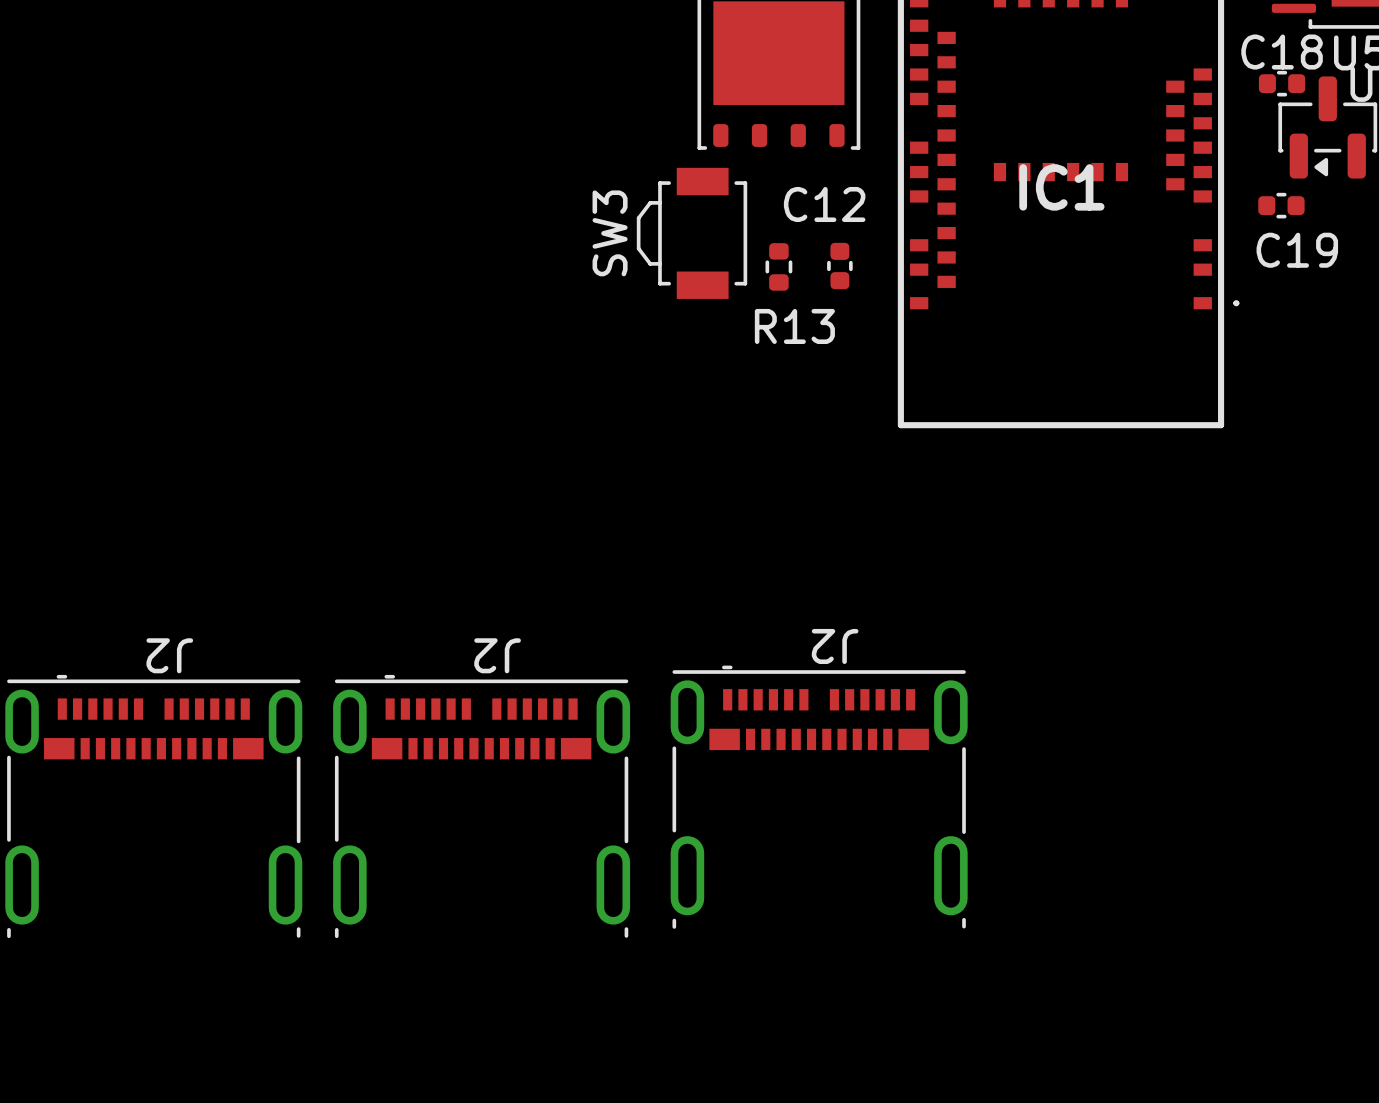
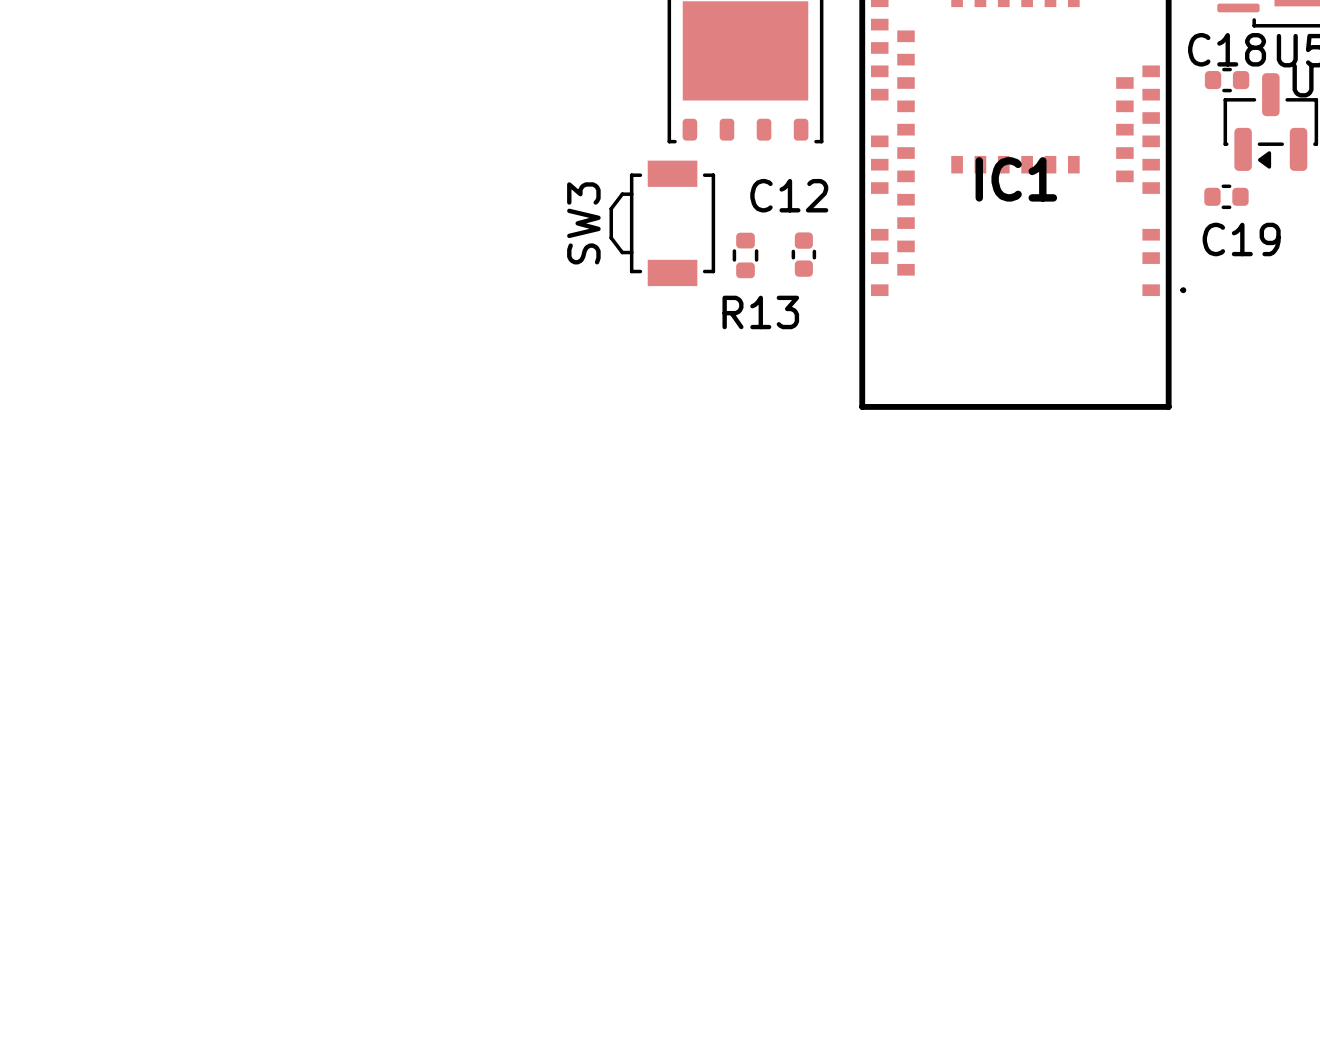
J2: (819, 797) -> none
J2: (153, 806) -> none
J2: (481, 806) -> none

